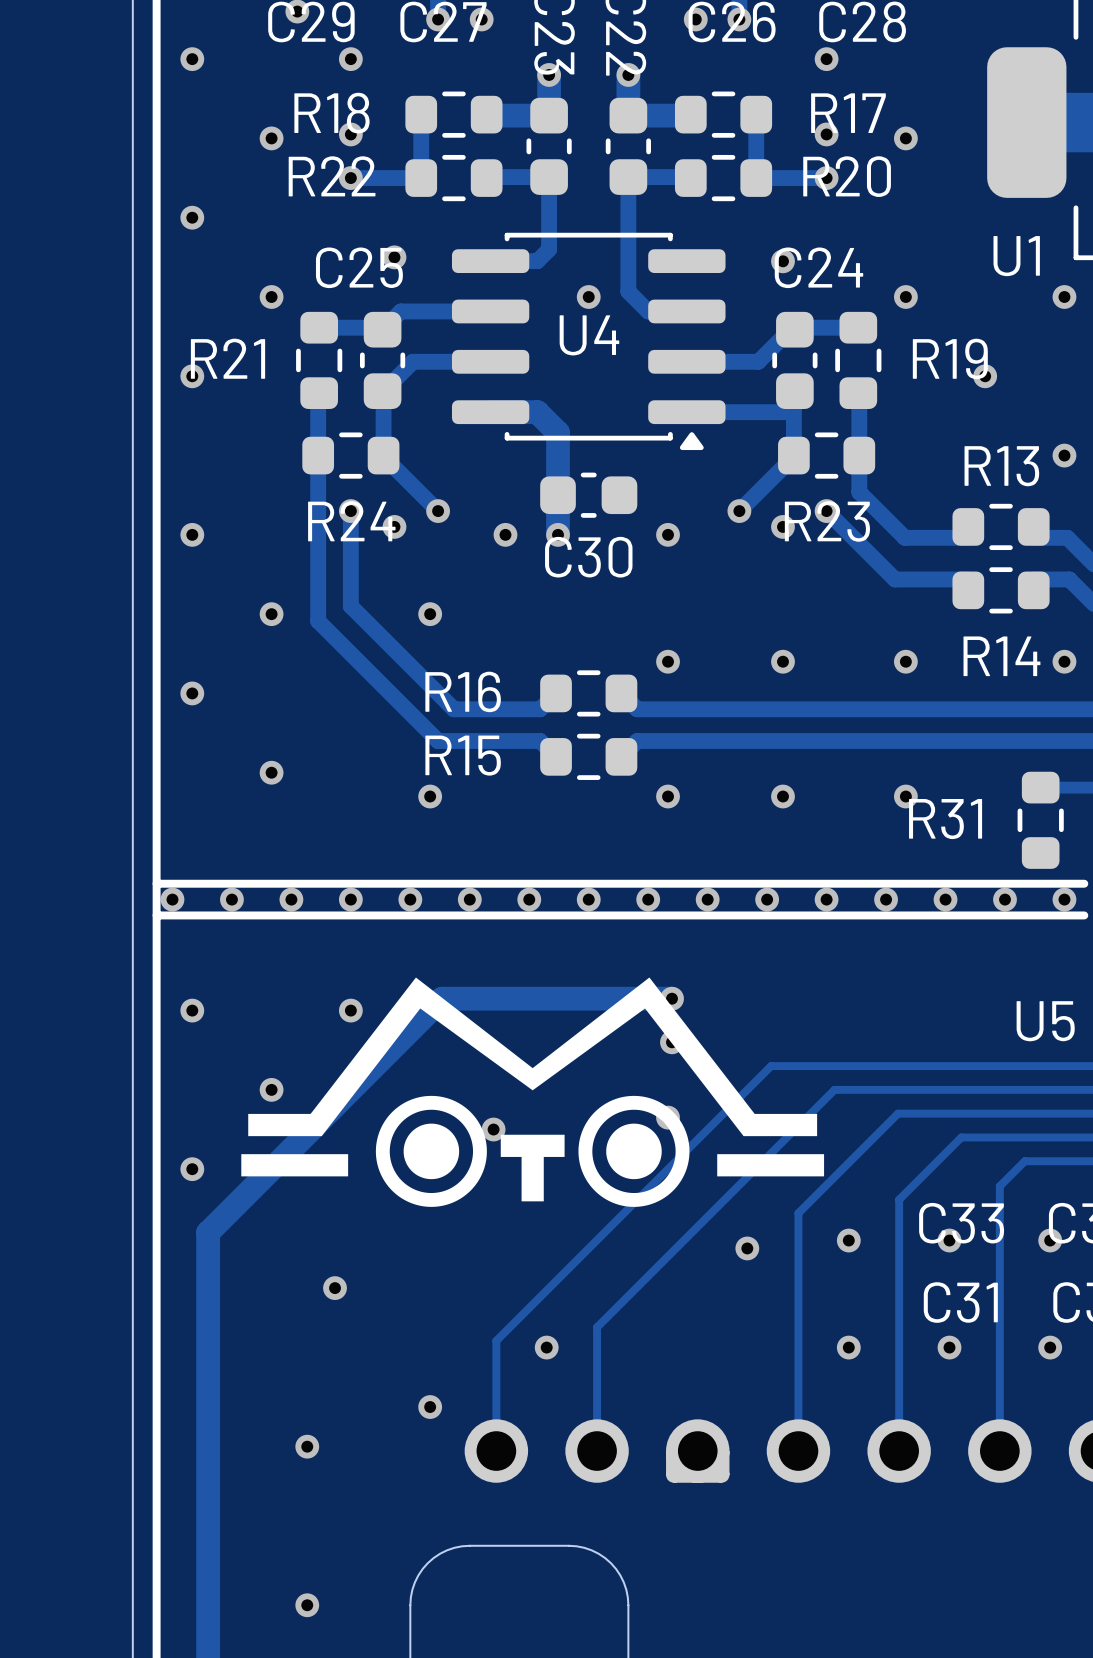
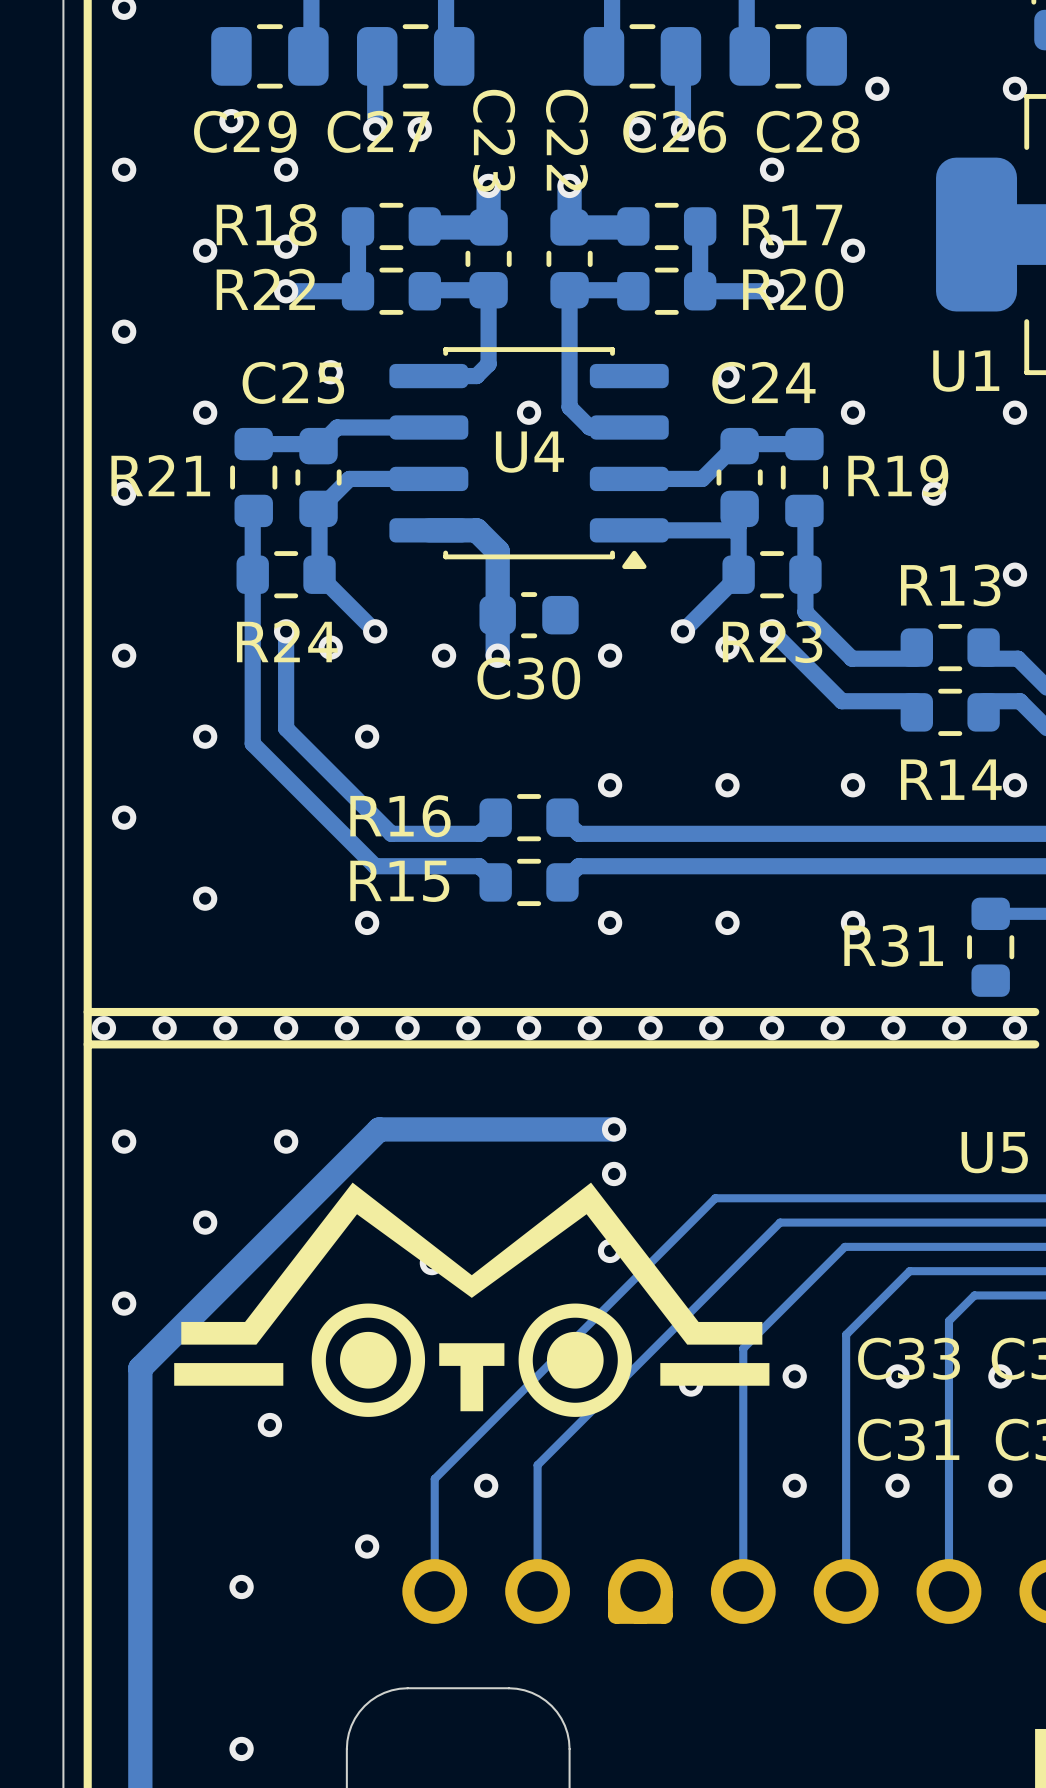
drawing position: (532, 1092) -> (471, 1299)

